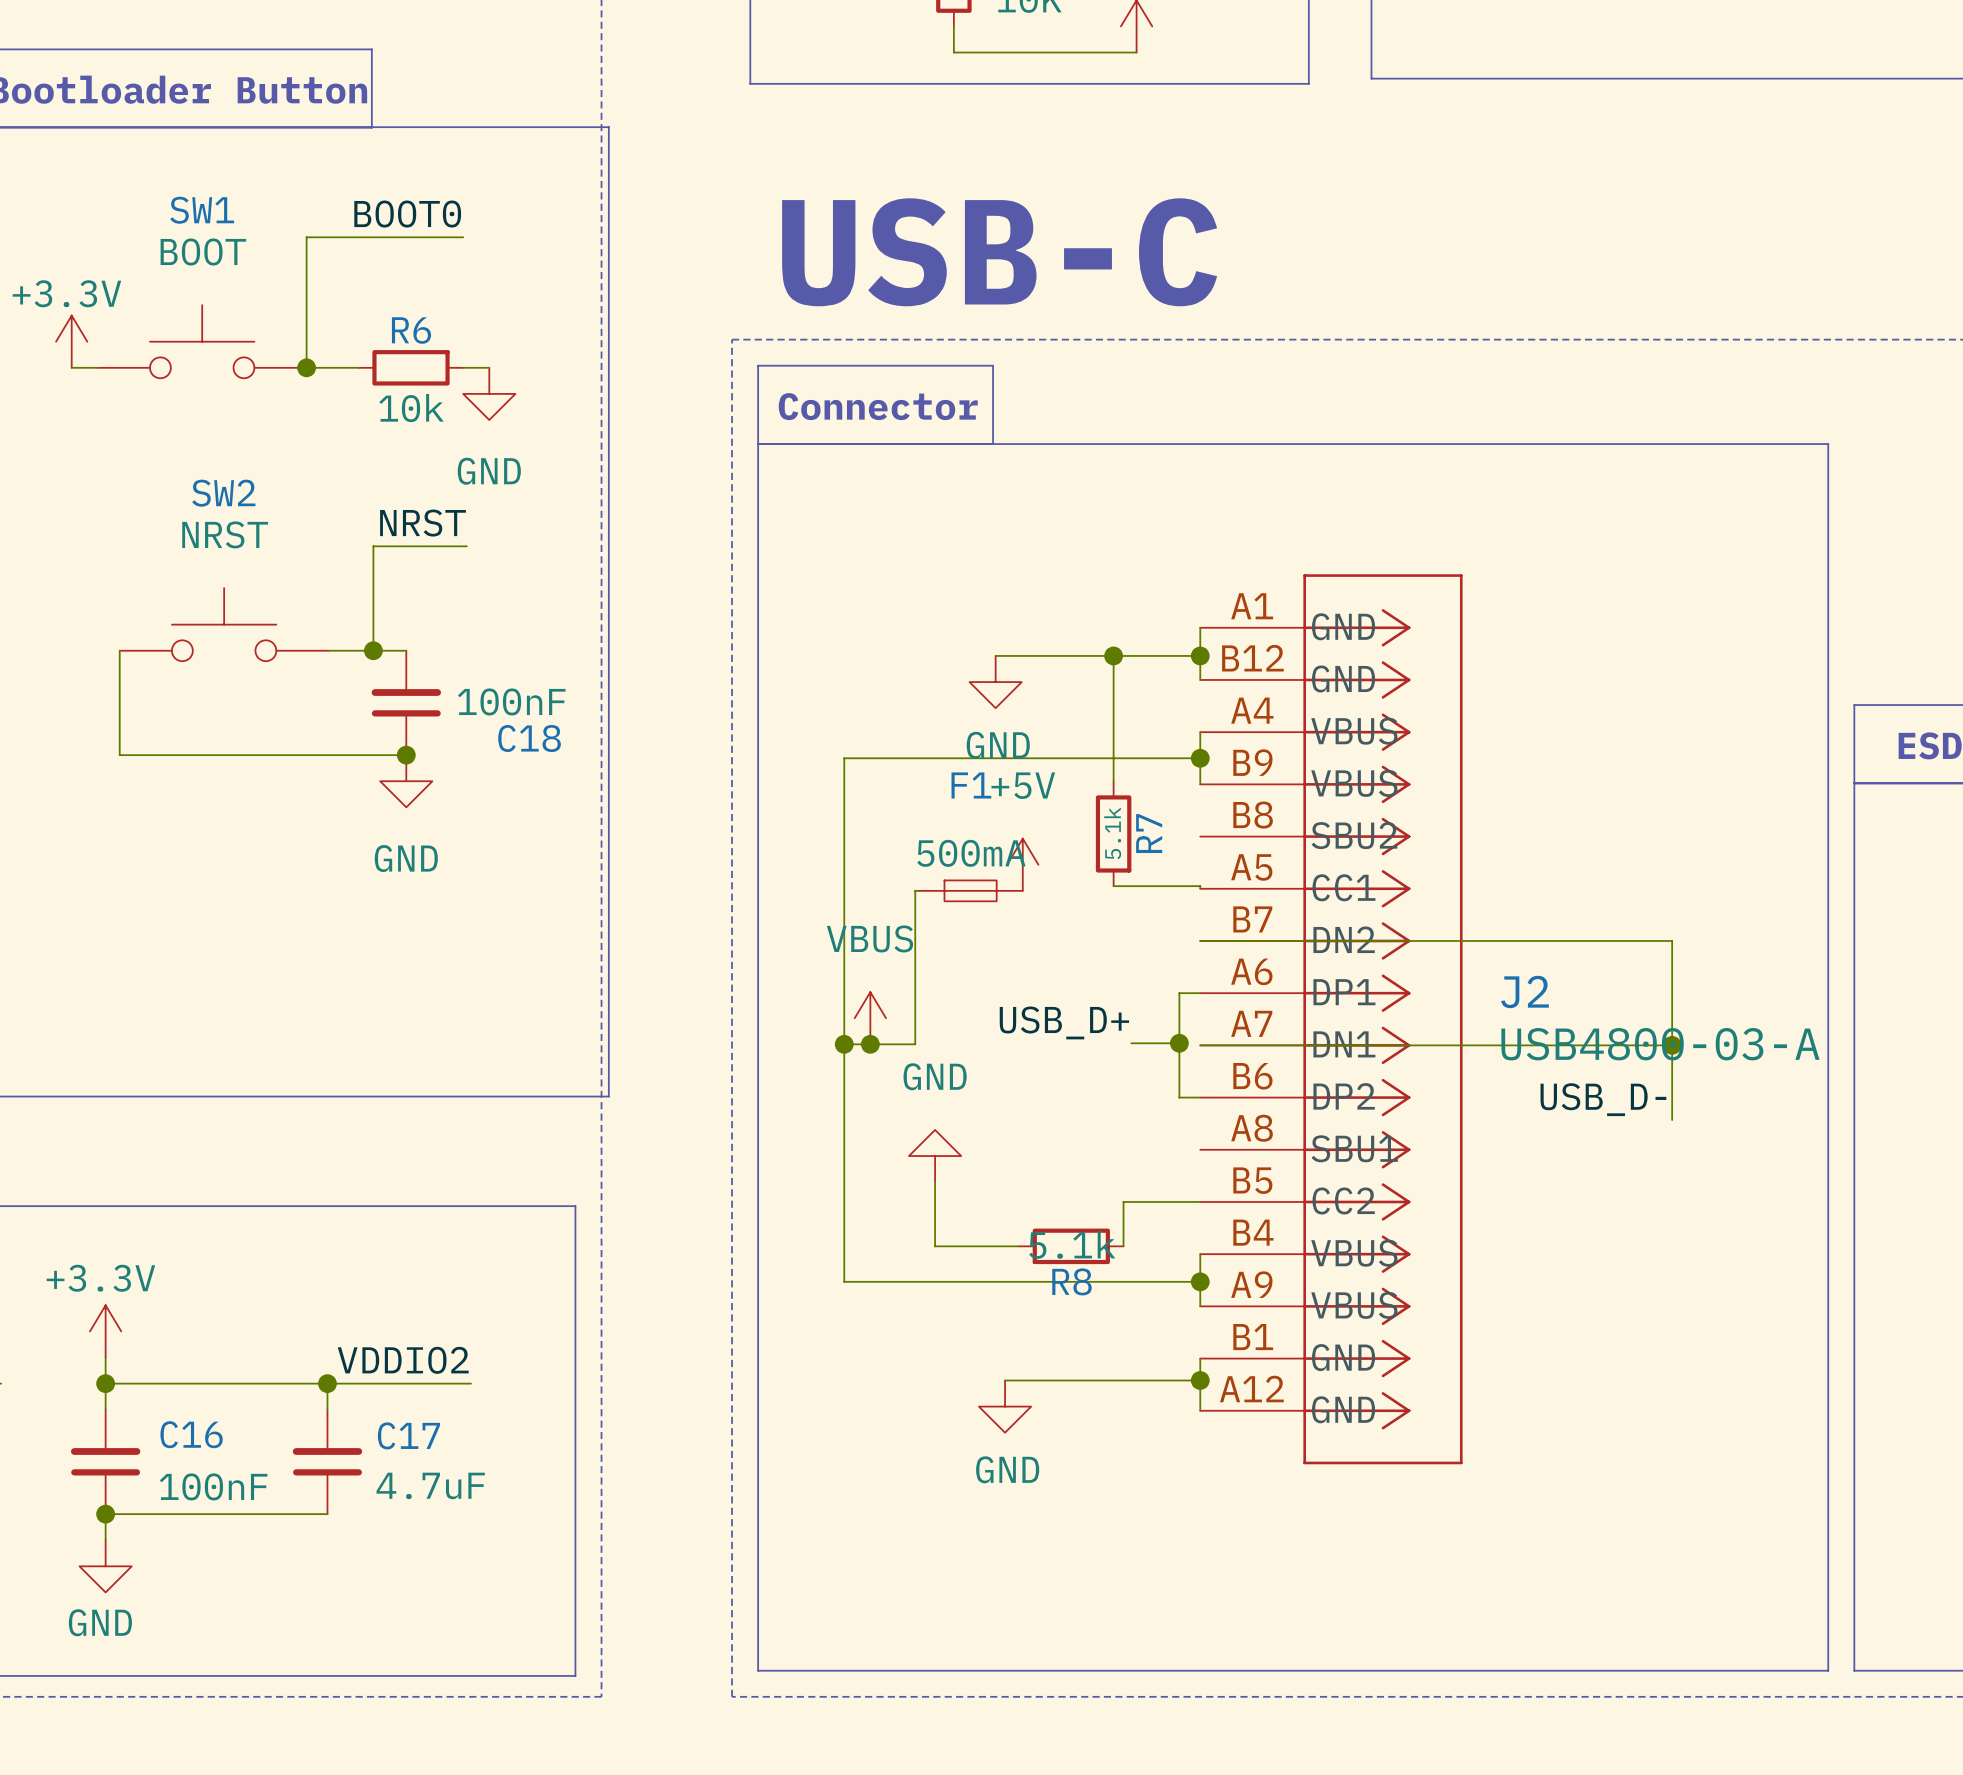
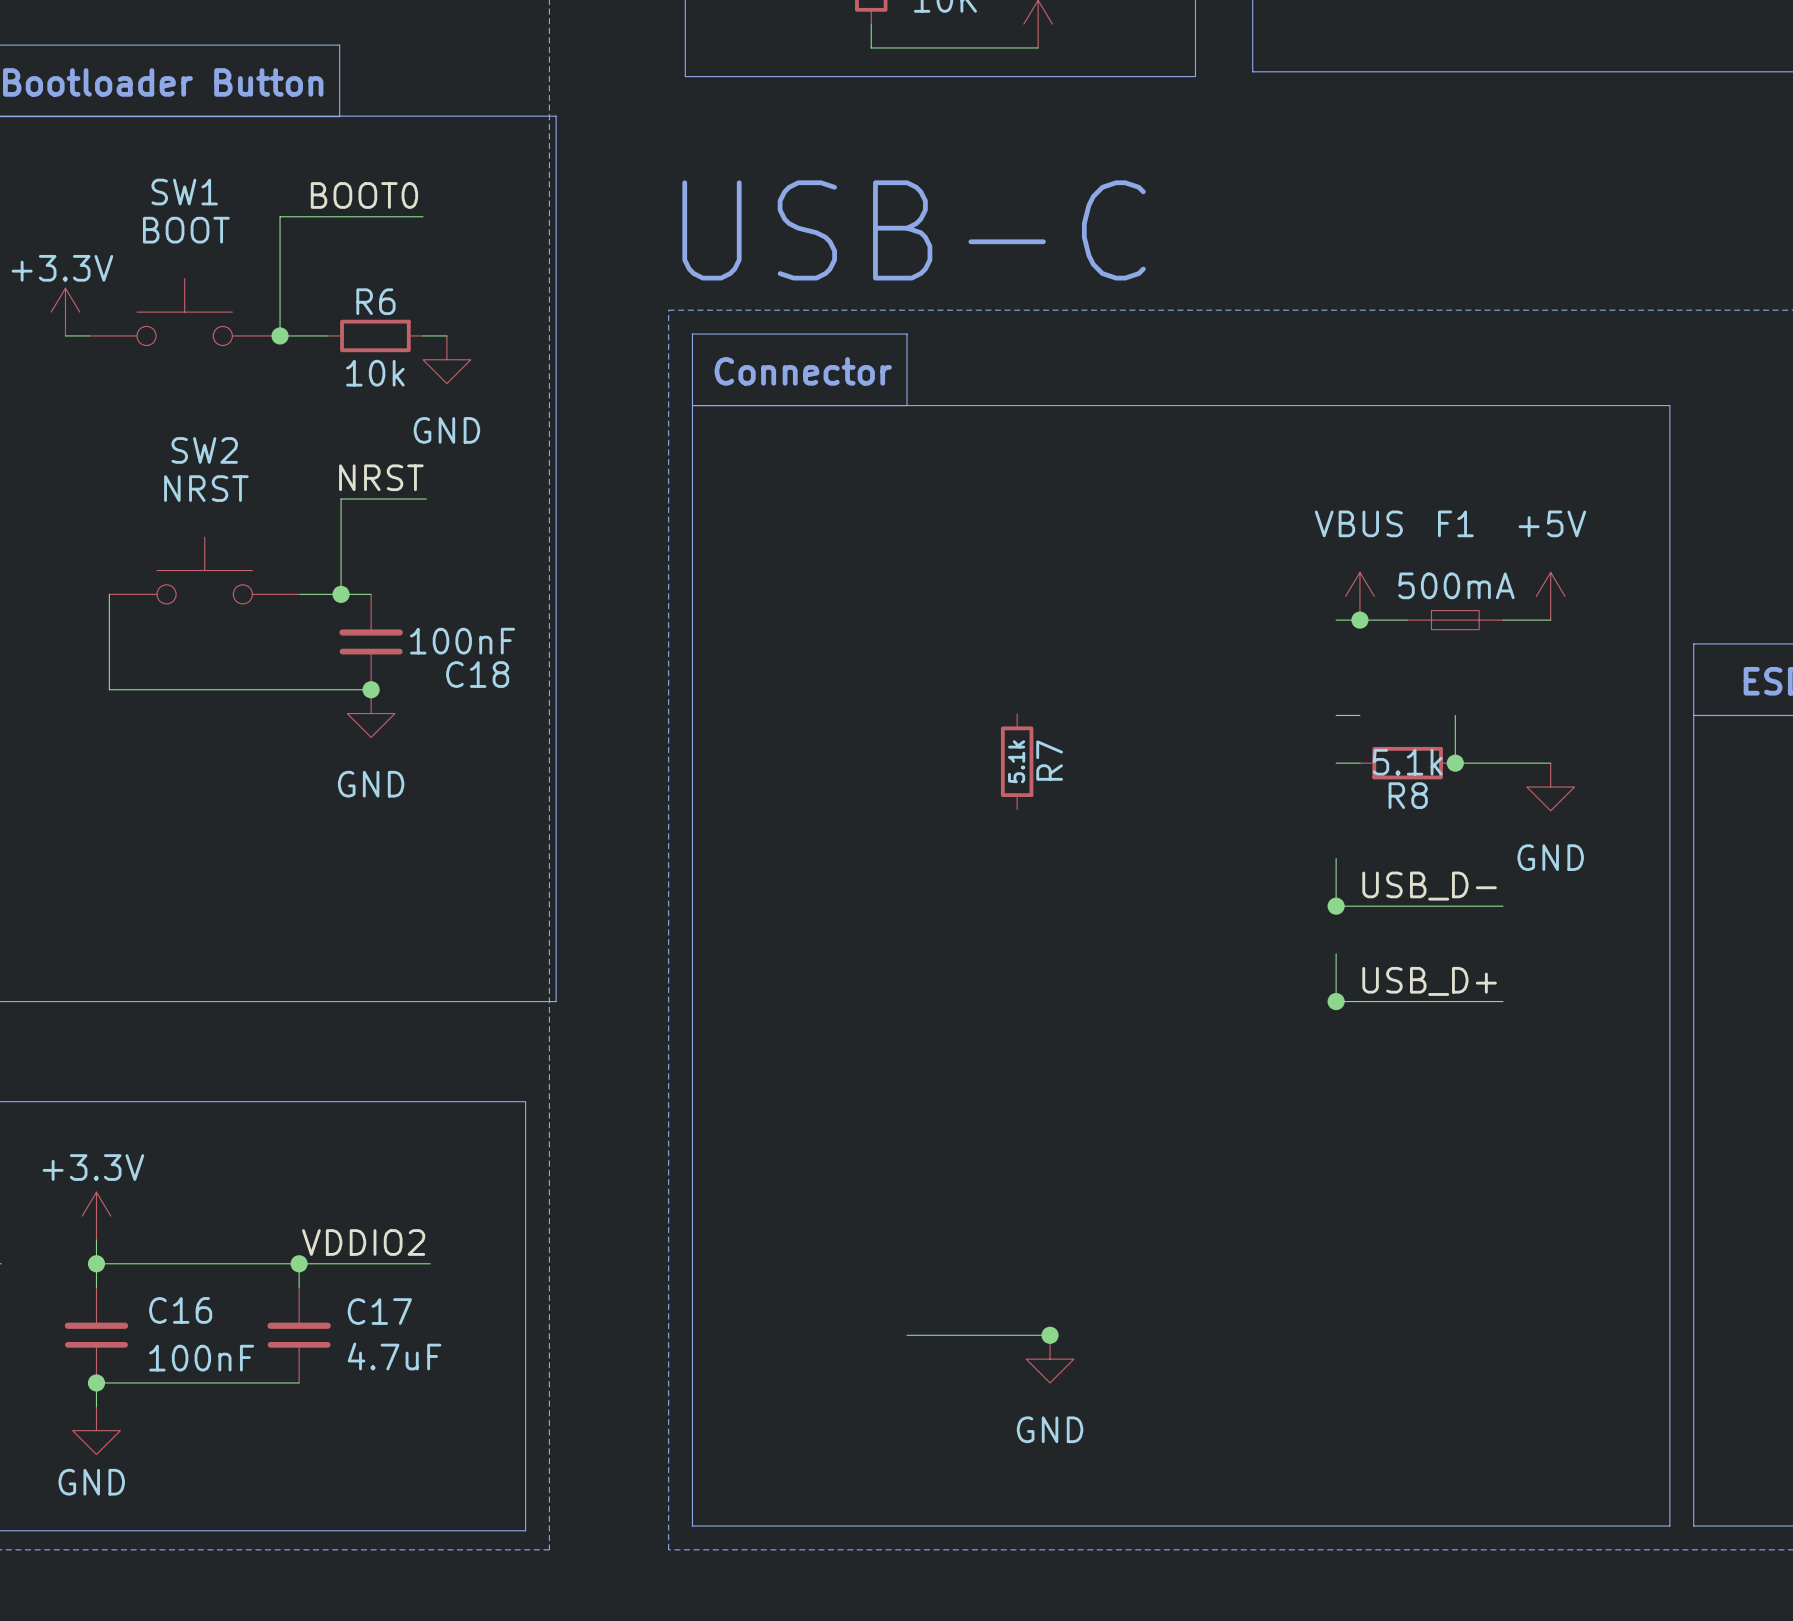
wire: (1200, 627) (1200, 679) -> none
power symbol: none -> VBUS (1359, 596)
power symbol: none -> +5V (1550, 596)
wire: (995, 655) (1200, 655) -> none
wire: (1113, 655) (1113, 781) -> none
junction: (1113, 655) -> none
junction: (1200, 655) -> none
wire: none -> (1336, 620) (1407, 620)
junction: none -> (1359, 620)
wire: none -> (1502, 620) (1550, 620)
power symbol: GND (995, 682) -> none
wire: (1200, 732) (1200, 784) -> none
wire: (1200, 758) (844, 758) (844, 1281) (1200, 1281) -> none
junction: (1200, 758) -> none
wire: none -> (1336, 715) (1359, 715)
wire: none -> (1455, 715) (1455, 763) (1550, 763)
wire: none -> (1336, 763) (1359, 763)
junction: none -> (1455, 763)
power symbol: none -> GND (1550, 786)
power symbol: +5V (1022, 864) -> none
wire: (1113, 886) (1200, 886) (1200, 888) -> none
wire: (918, 890) (915, 890) (915, 1044) (844, 1044) -> none
F1 position: (970, 890) -> (1455, 620)
wire: none -> (1336, 858) (1336, 906) (1502, 906)
wire: (1200, 940) (1672, 940) (1672, 1120) -> none
junction: none -> (1336, 906)
wire: (1200, 993) (1179, 993) (1179, 1097) (1200, 1097) -> none
power symbol: VBUS (870, 1018) -> none
J2: USB4800-03-A (1331, 1019) -> none
label: USB_D+ (1064, 1022) -> none
wire: (1131, 1043) (1179, 1043) -> none
junction: (1179, 1043) -> none
junction: (844, 1044) -> none
junction: (870, 1044) -> none
wire: none -> (1336, 953) (1336, 1001) (1502, 1001)
wire: (1200, 1045) (1672, 1045) -> none
junction: (1672, 1045) -> none
label: none -> USB_D+ (1429, 981)
junction: none -> (1336, 1001)
label position: USB_D- (1603, 1099) -> USB_D- (1429, 886)
power symbol: GND (935, 1156) -> none
wire: (935, 1182) (935, 1246) (1019, 1246) -> none
wire: (1200, 1201) (1123, 1201) (1123, 1246) -> none
R8 position: (1071, 1246) -> (1407, 763)
wire: (1200, 1254) (1200, 1306) -> none
junction: (1200, 1281) -> none
wire: (1200, 1358) (1200, 1410) -> none
wire: (1005, 1380) (1200, 1380) -> none
junction: (1200, 1380) -> none
power symbol position: GND (1005, 1406) -> GND (1050, 1359)
wire: none -> (907, 1335) (1050, 1335)
junction: none -> (1050, 1335)
power symbol text position: GND (1007, 1469) -> GND (1050, 1429)

